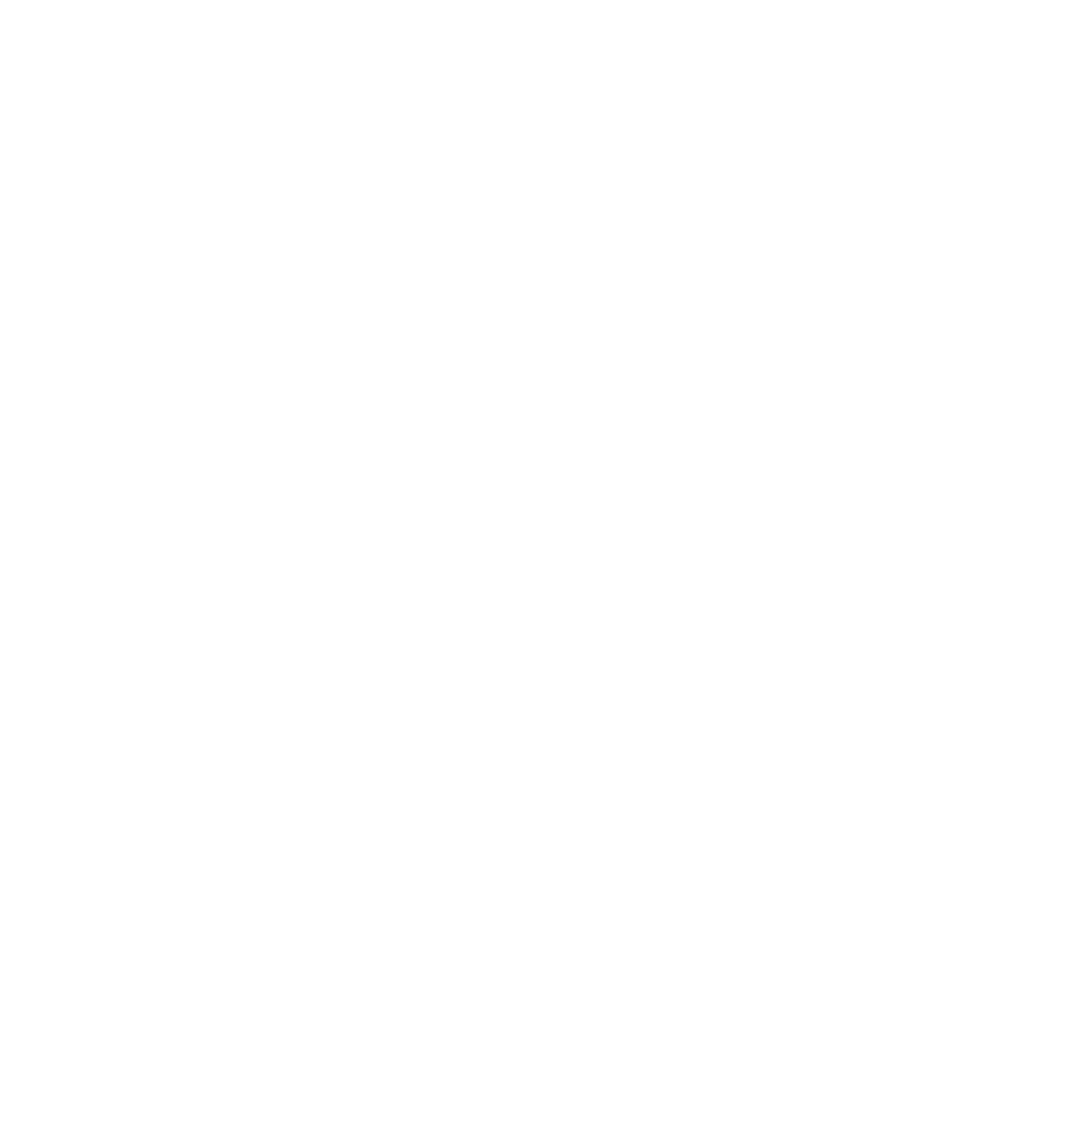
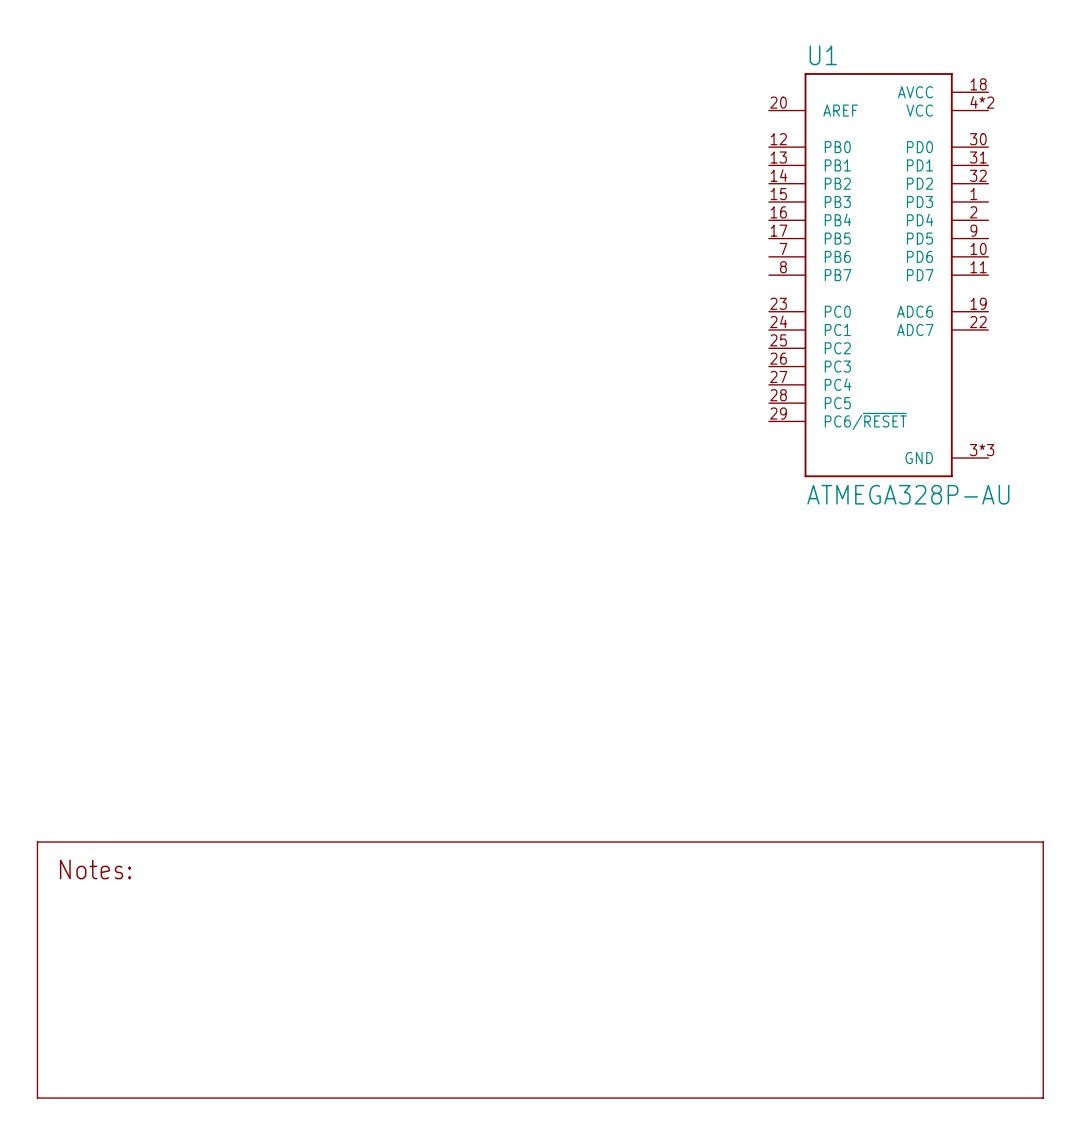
U1: none -> ATMEGA328P-AU (878, 275)
part: none -> (540, 970)

